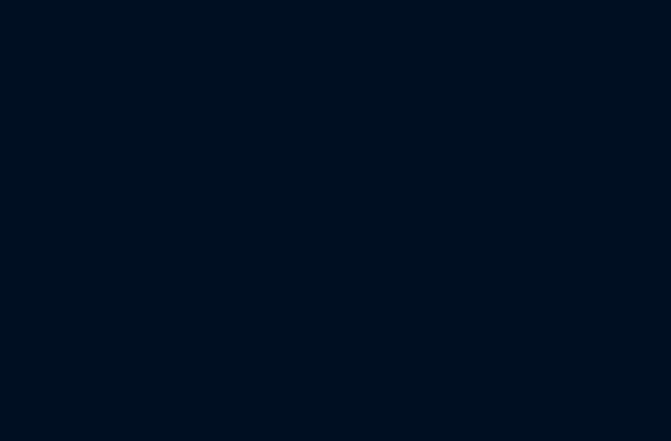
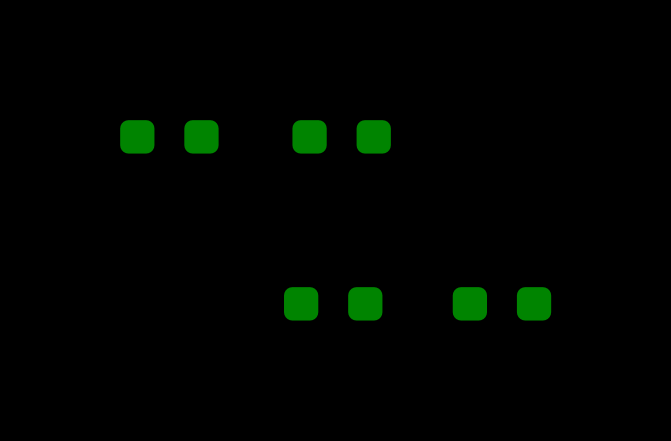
part: none -> (169, 136)
part: none -> (341, 136)
part: none -> (333, 303)
part: none -> (501, 303)

